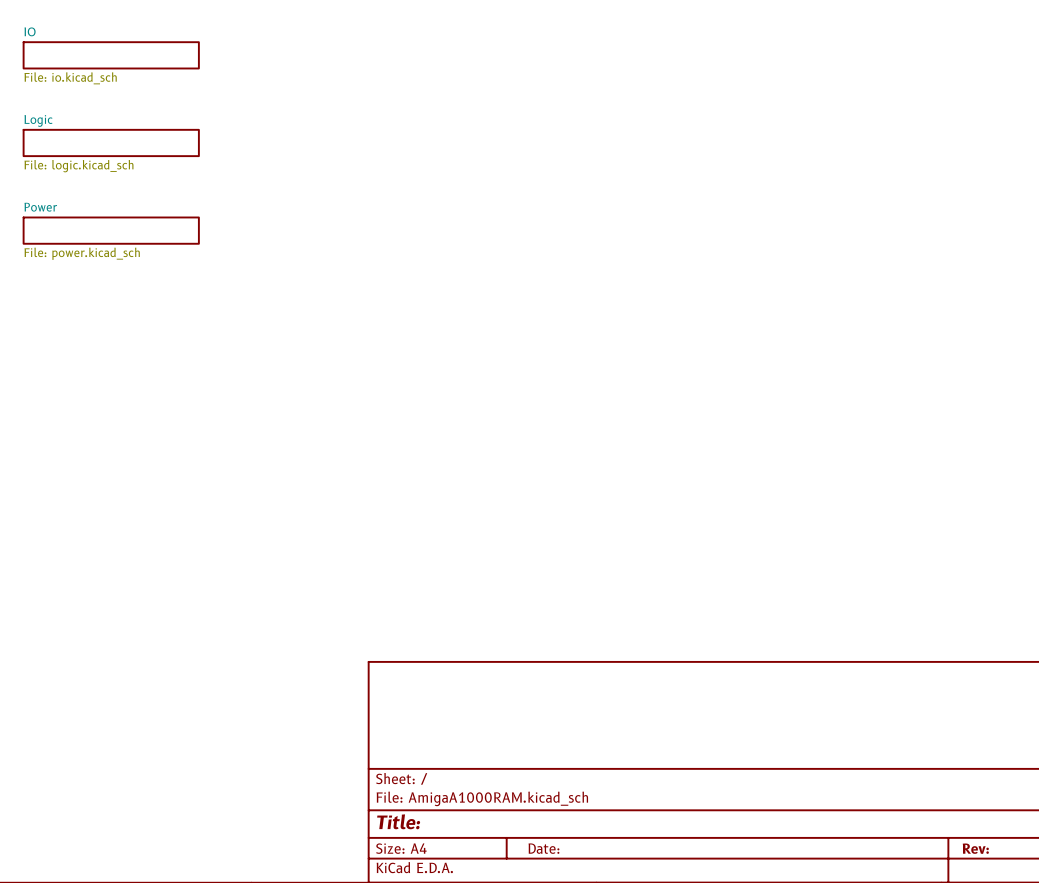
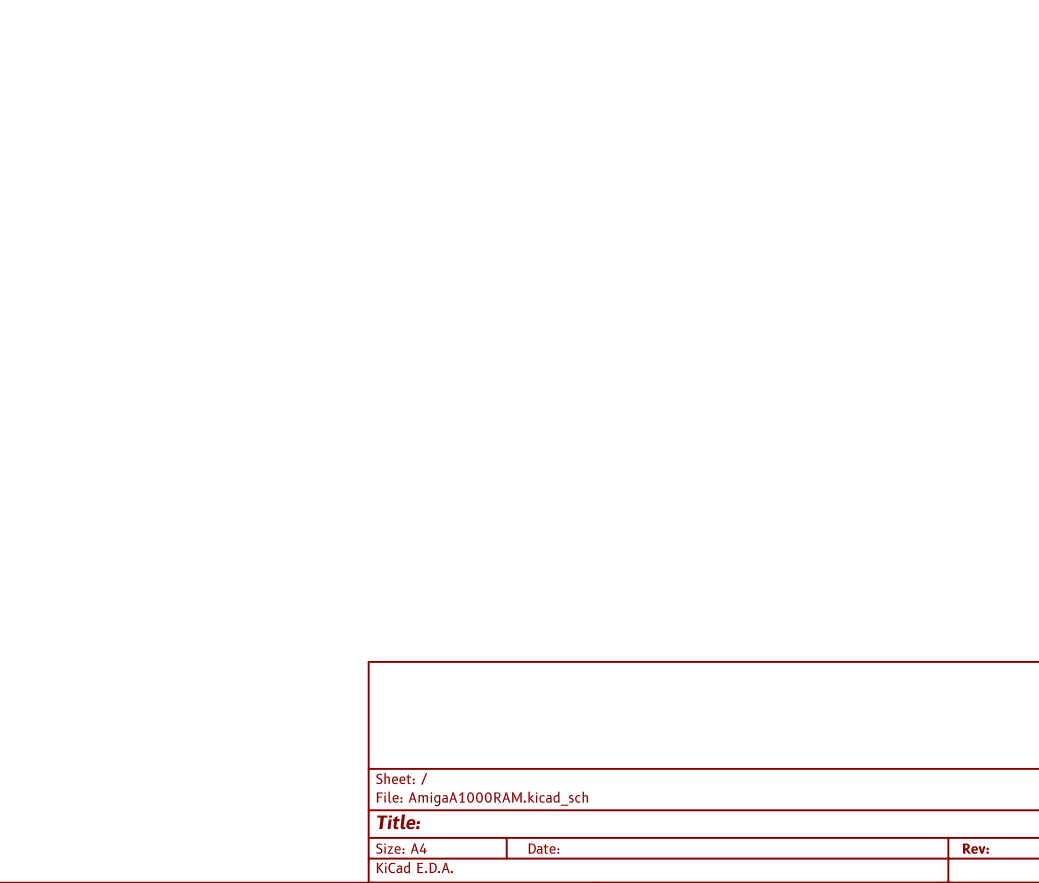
sheet IO: File: io.kicad_sch (111, 55) -> none
sheet Logic: File: logic.kicad_sch (111, 142) -> none
sheet Power: File: power.kicad_sch (111, 230) -> none

